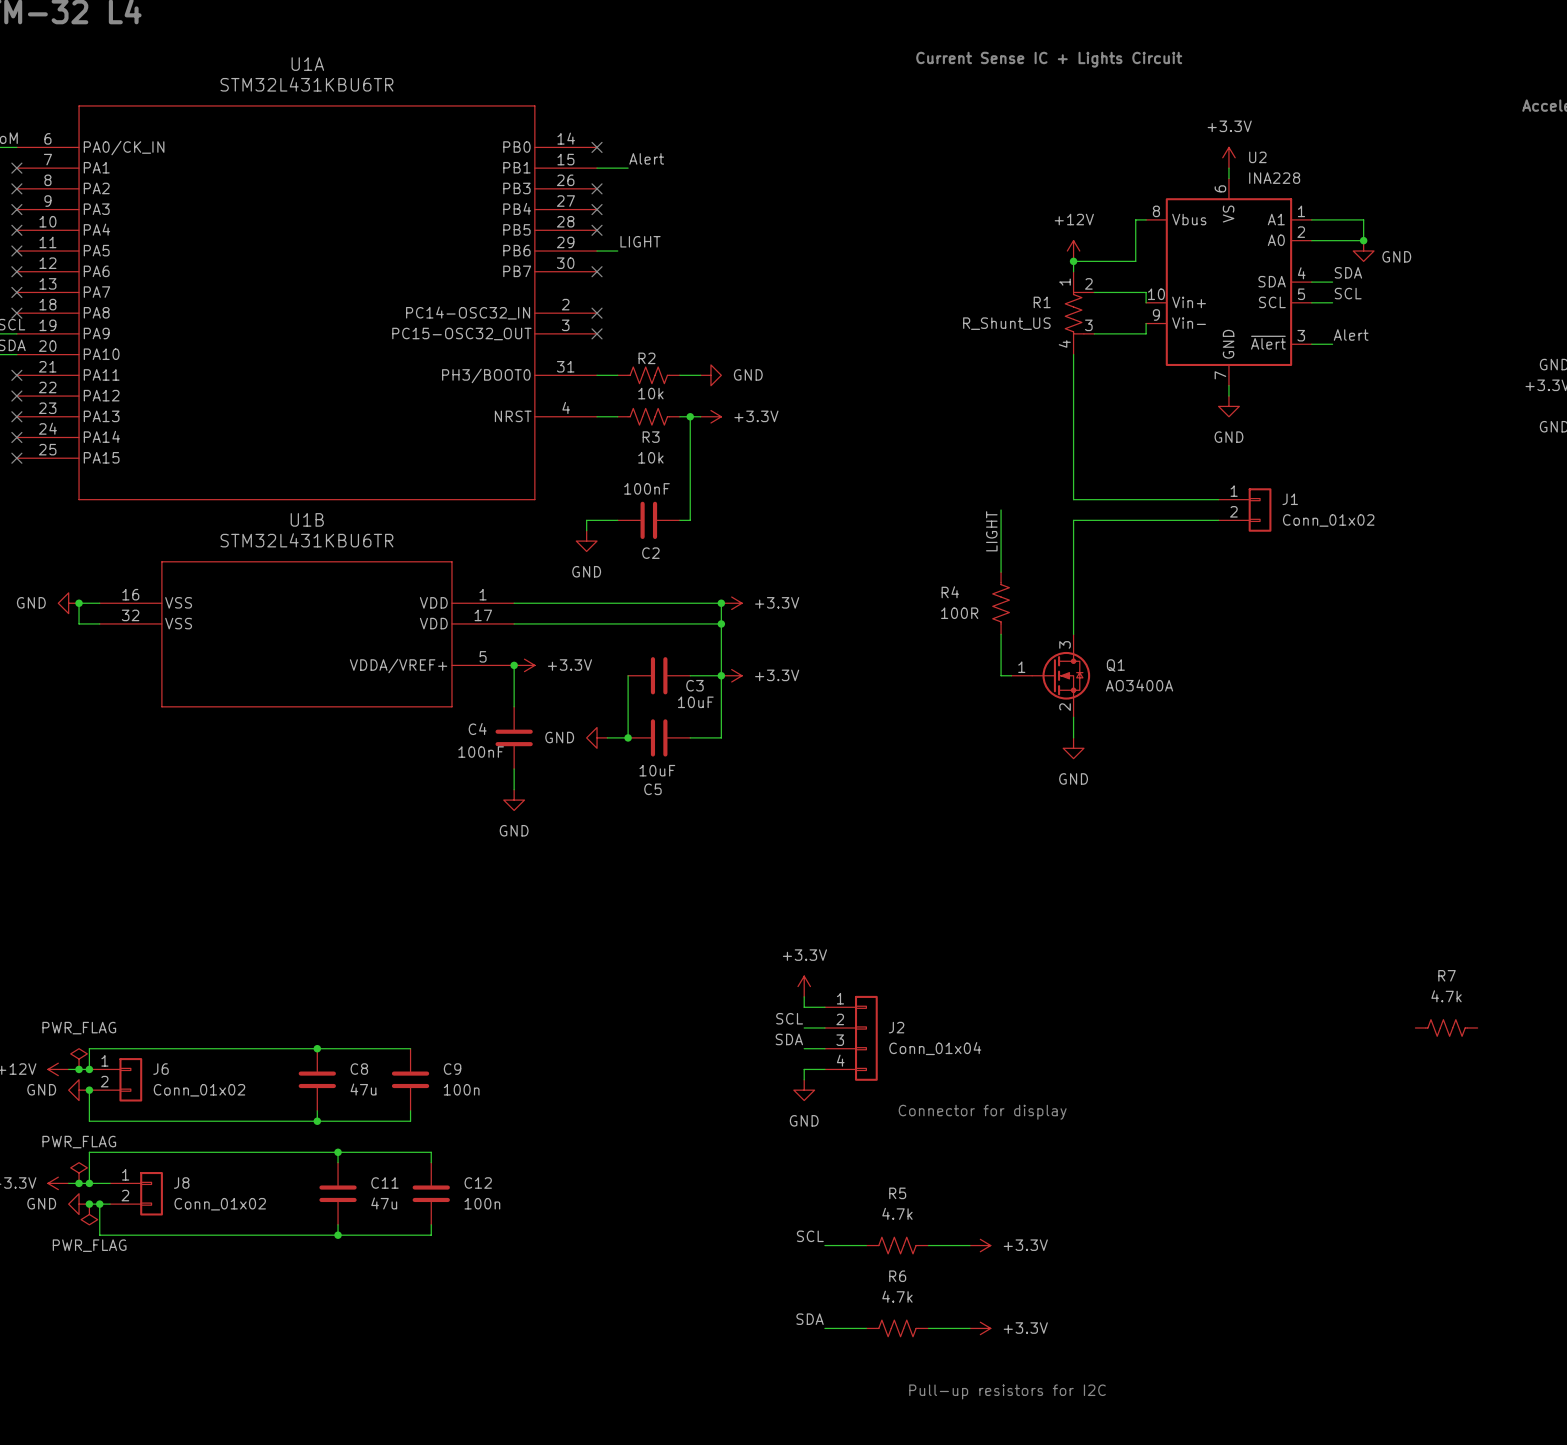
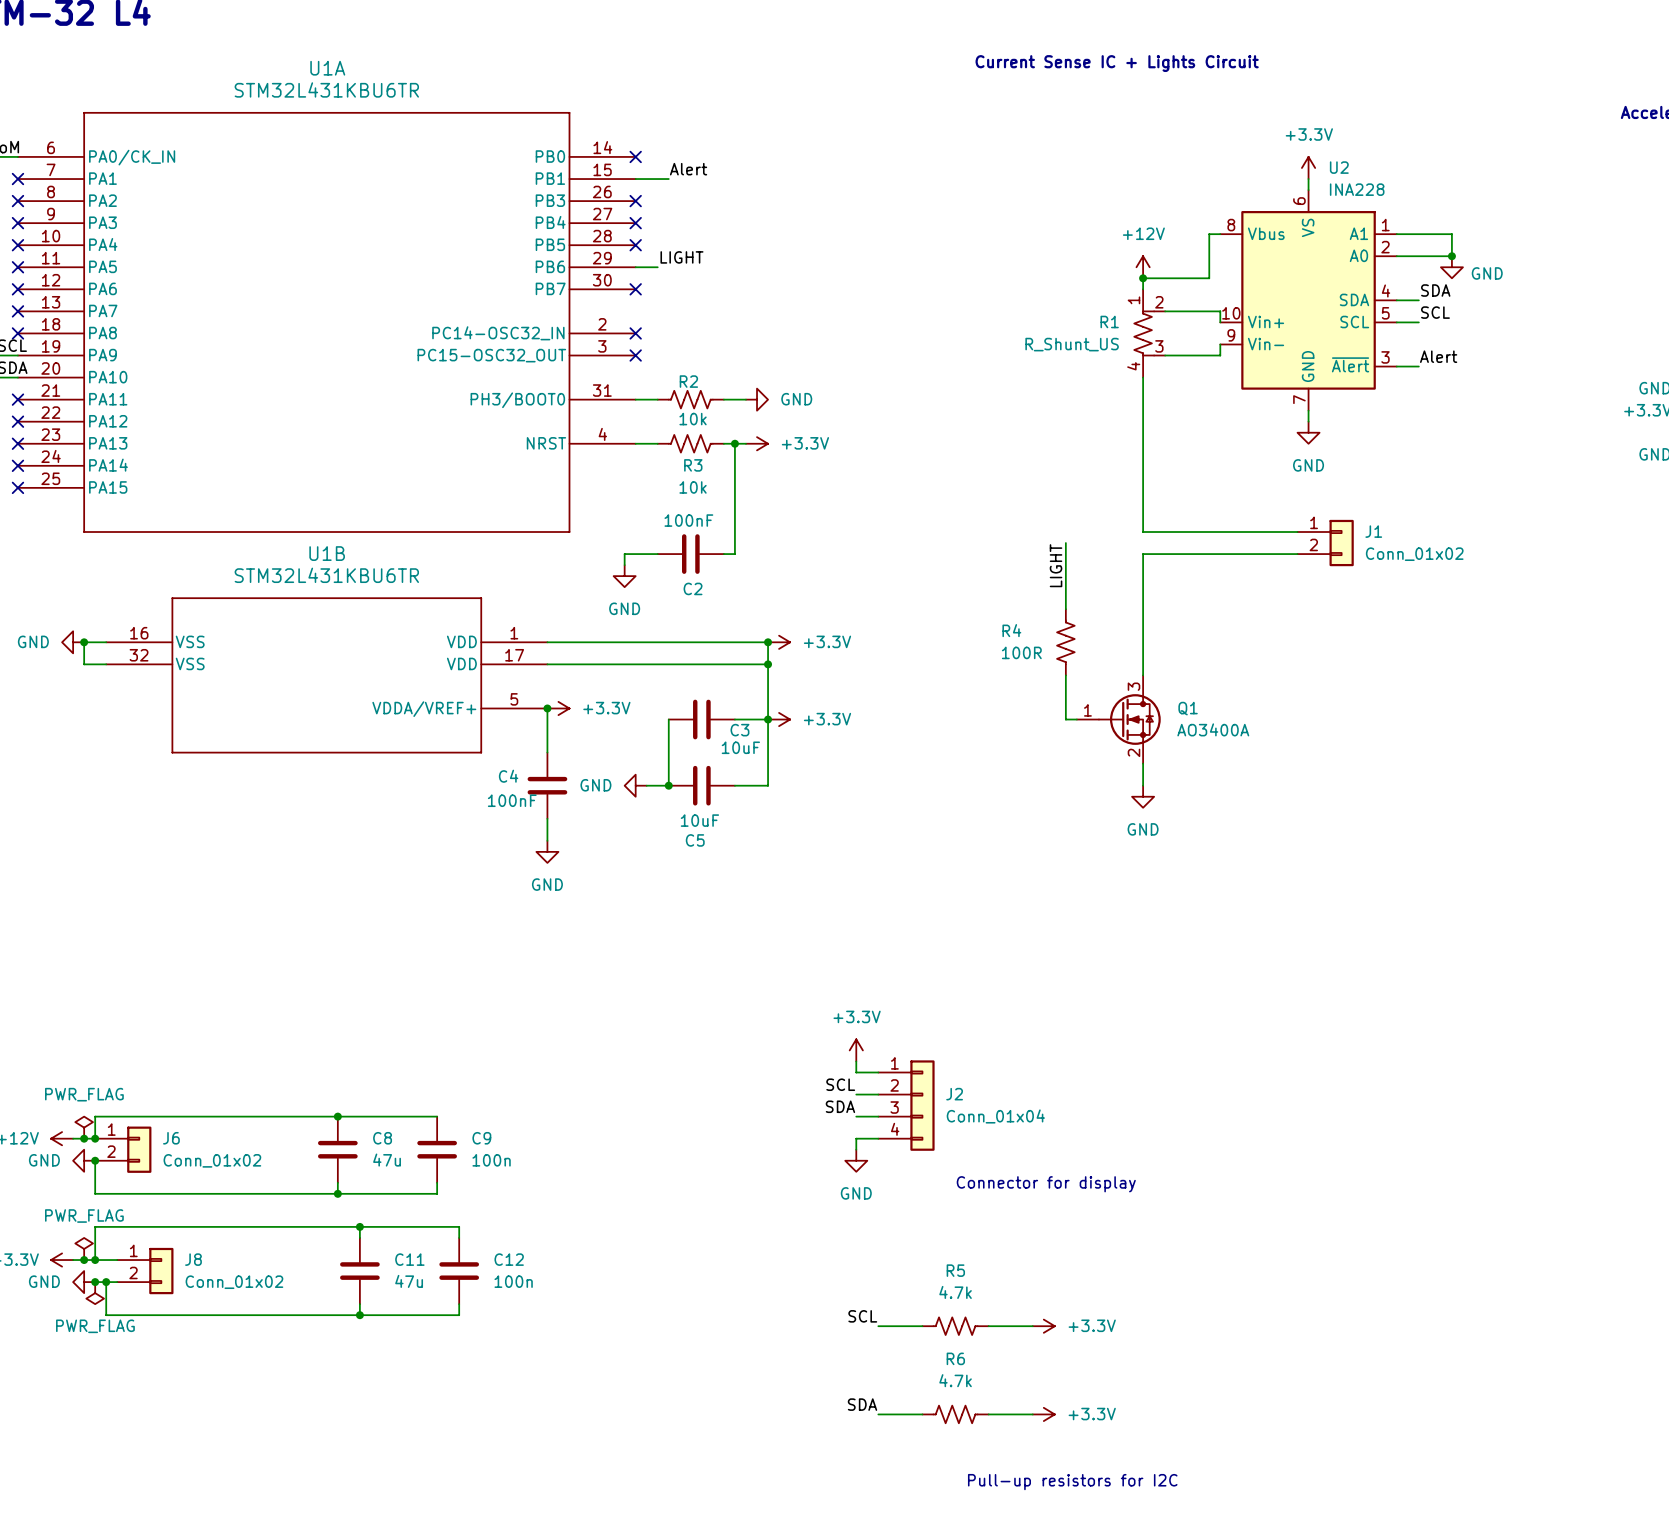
R7: 4.7k (1446, 1027) -> none

